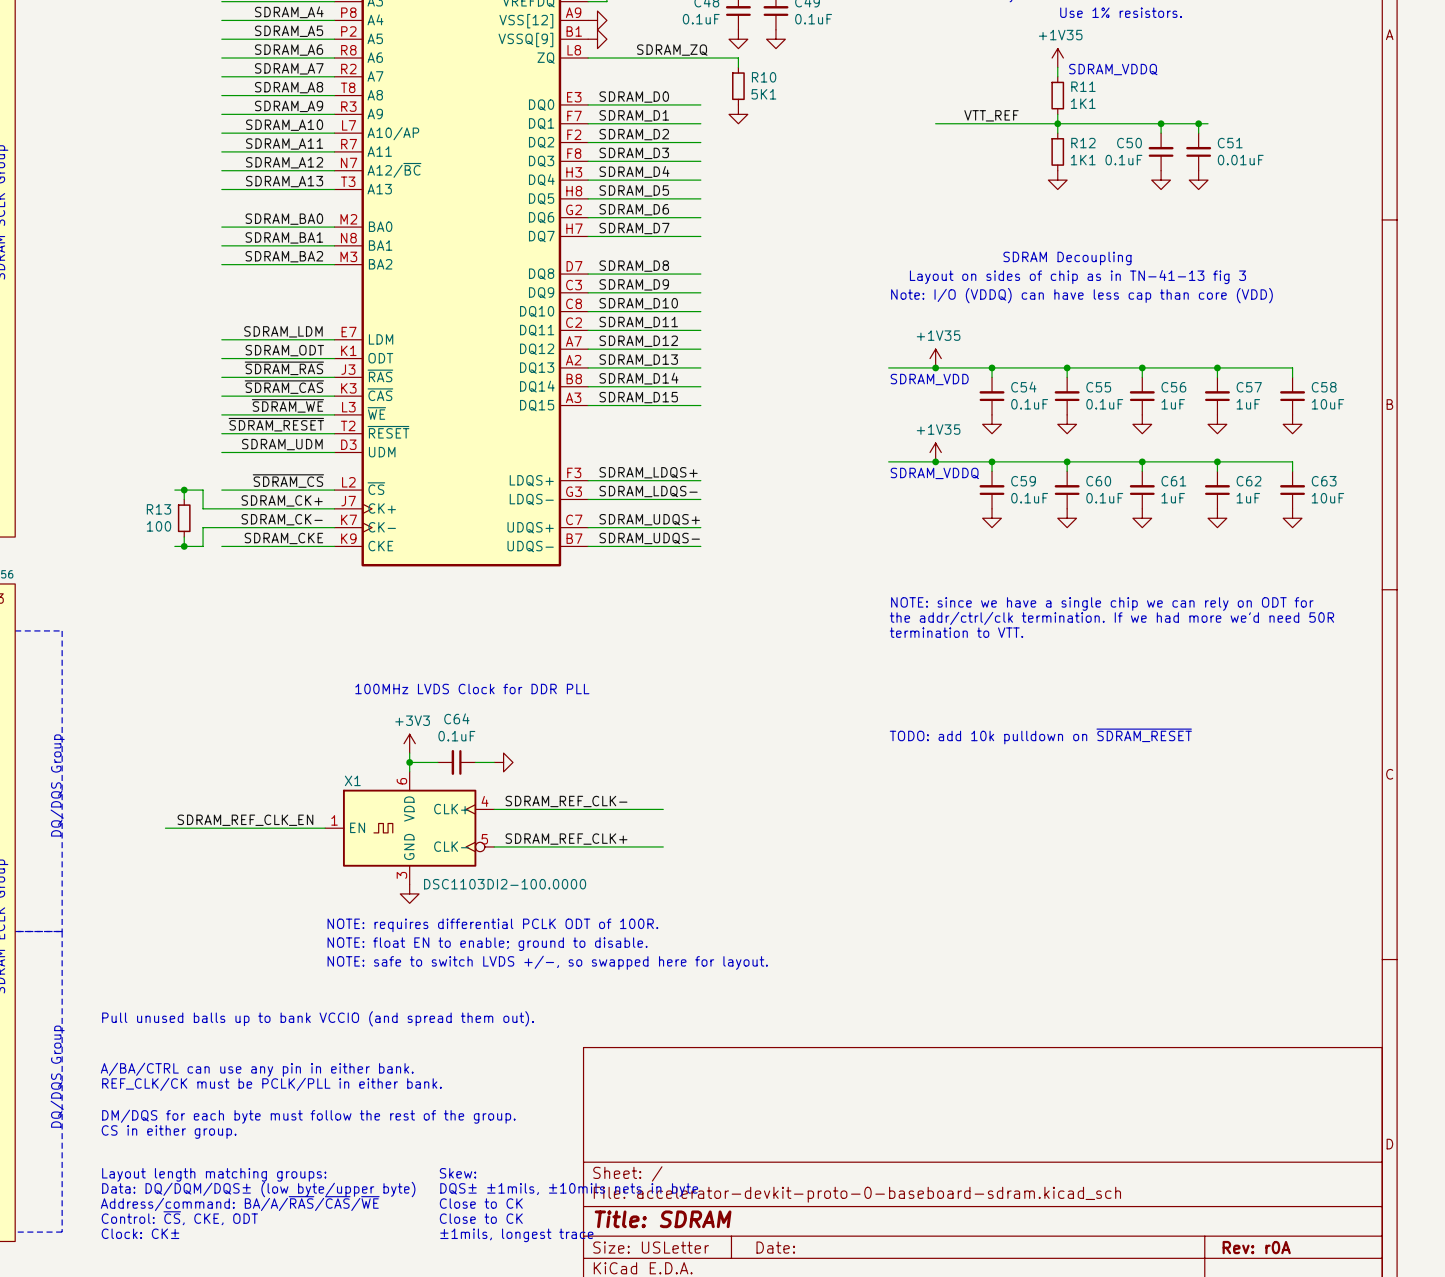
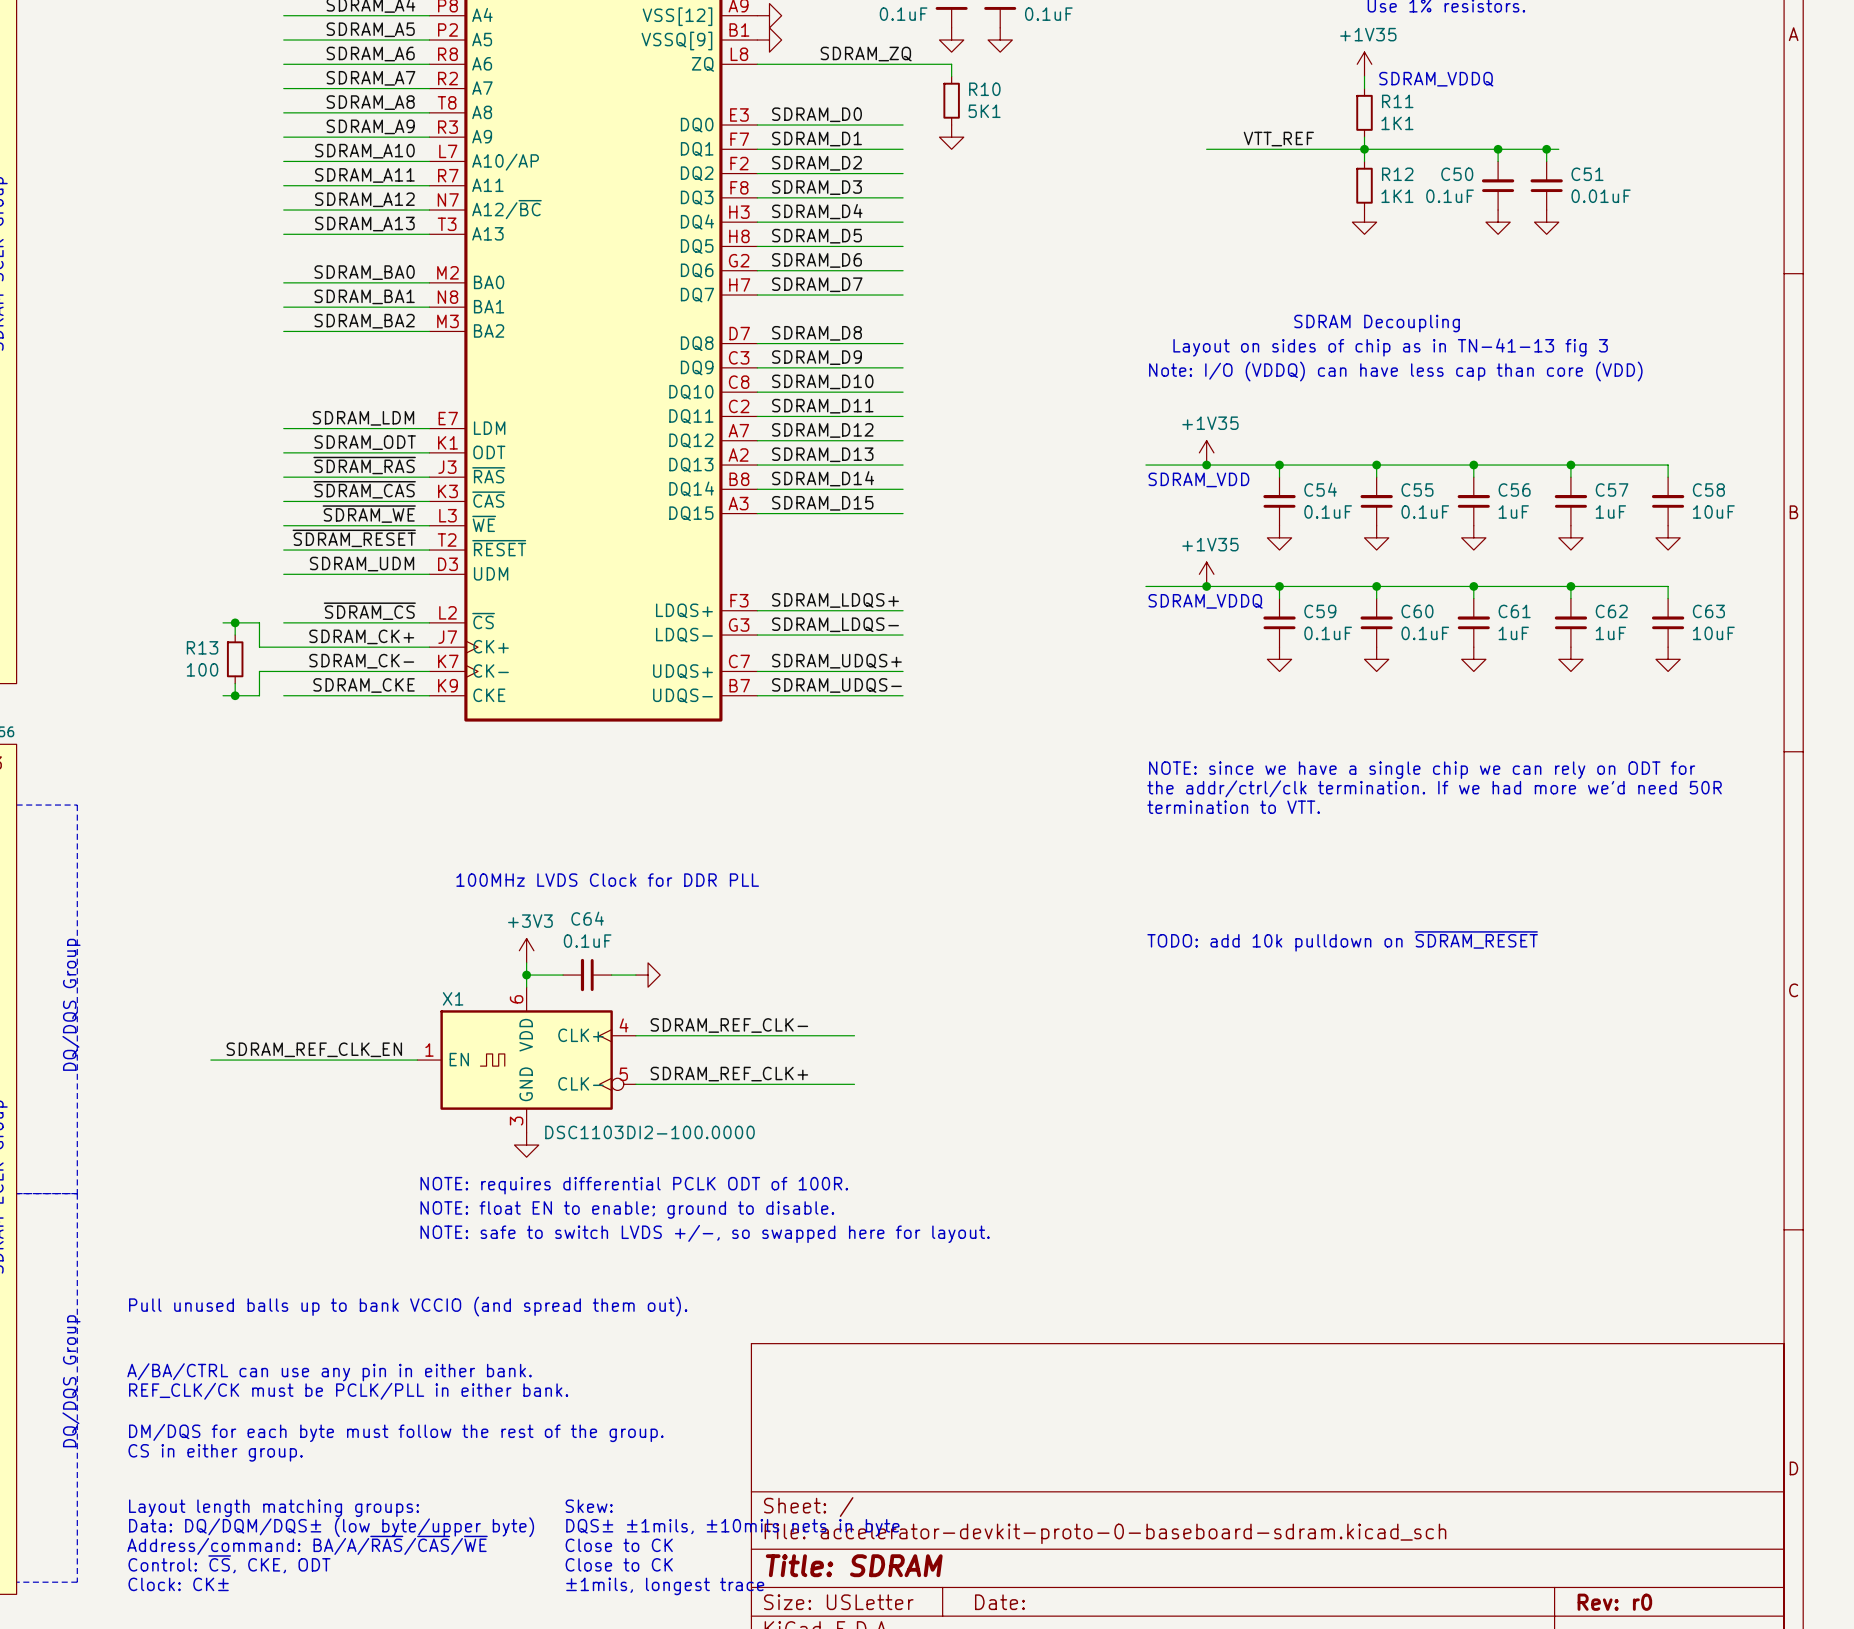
title block: Rev: r0A (1256, 1247) -> Rev: r0 (1614, 1602)

